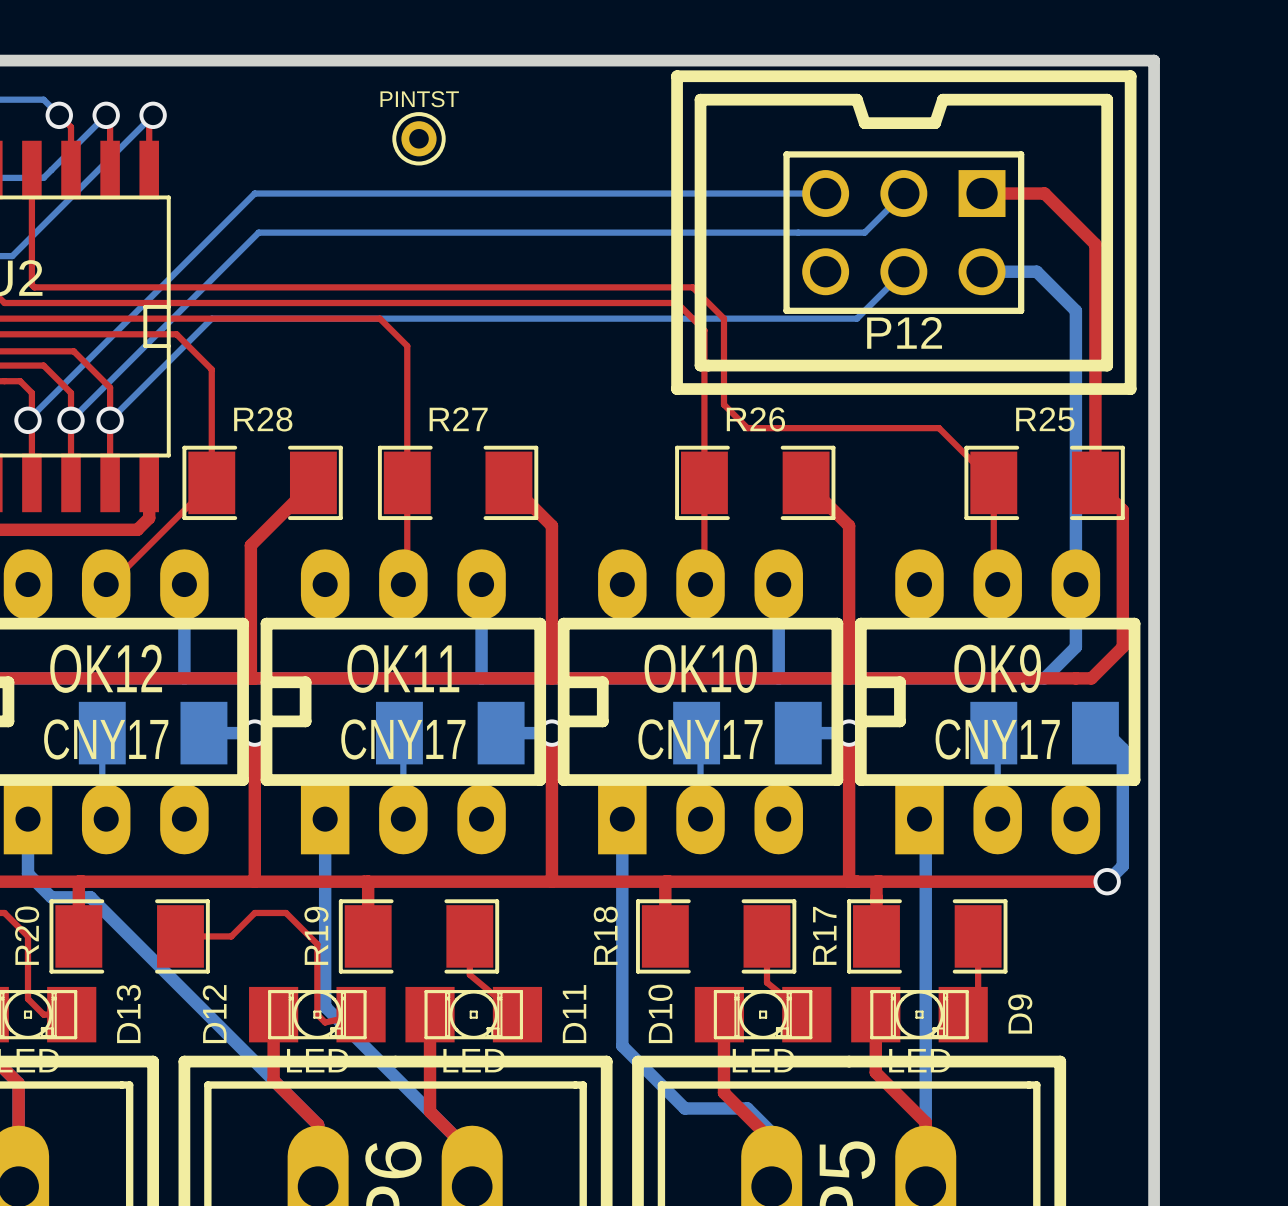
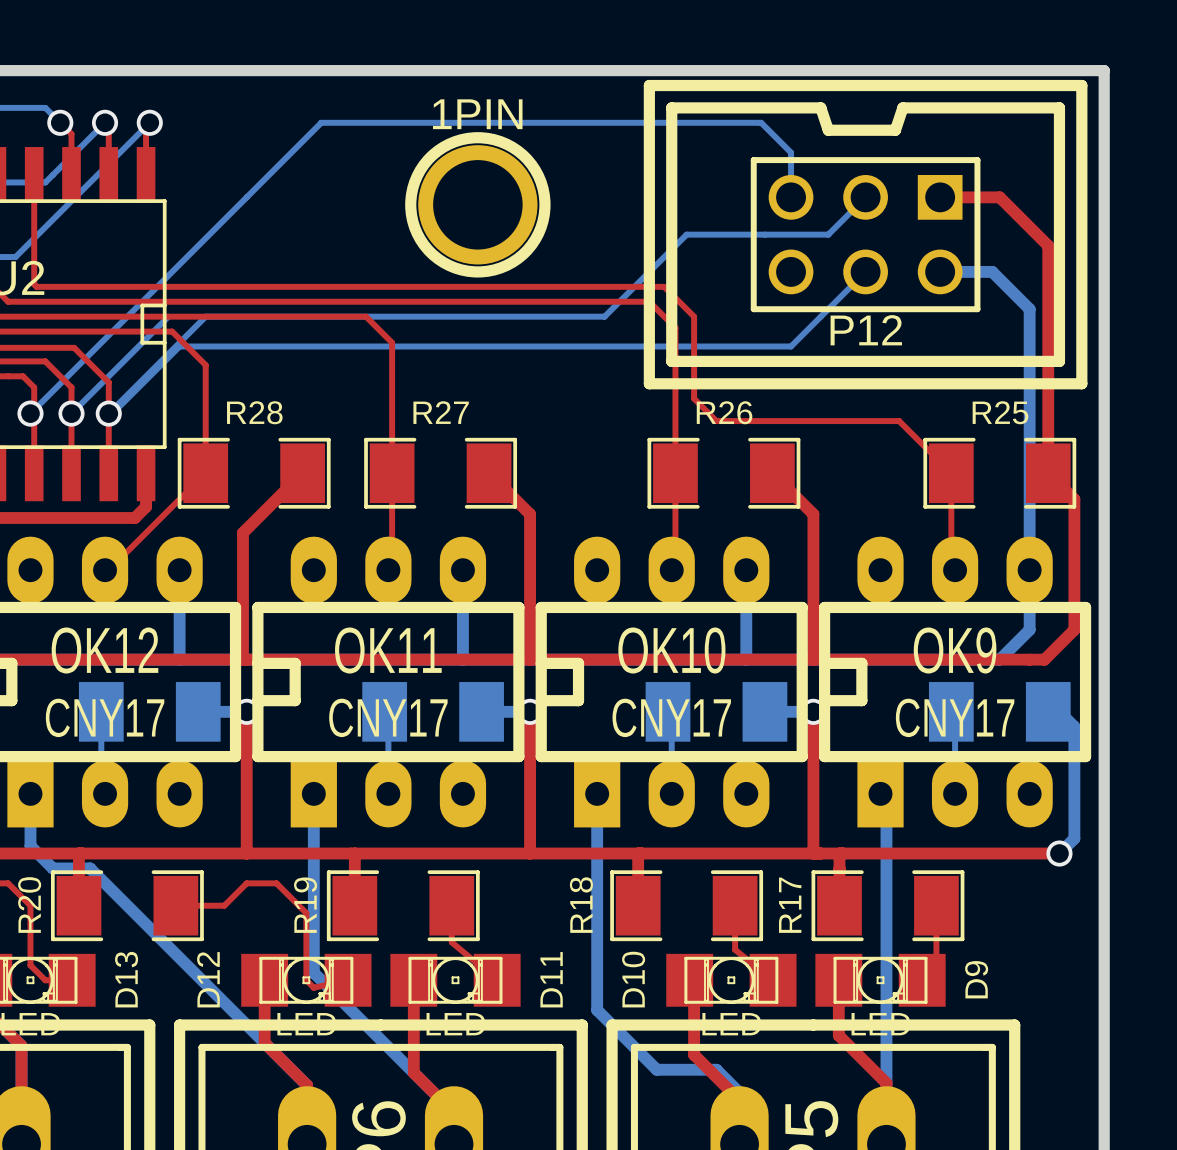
PINTST: (419, 138) -> none
bottom track: (254, 193) (825, 193) -> (246, 197) (321, 122) (761, 122) (791, 152) (791, 197)
1PIN: none -> (477, 204)
bottom track: (716, 232) (258, 232) (172, 318) -> none
bottom track: (630, 318) (856, 318) -> (604, 316) (686, 234)
bottom track: none -> (820, 316) (791, 346) (179, 346) (112, 413) (108, 413)

